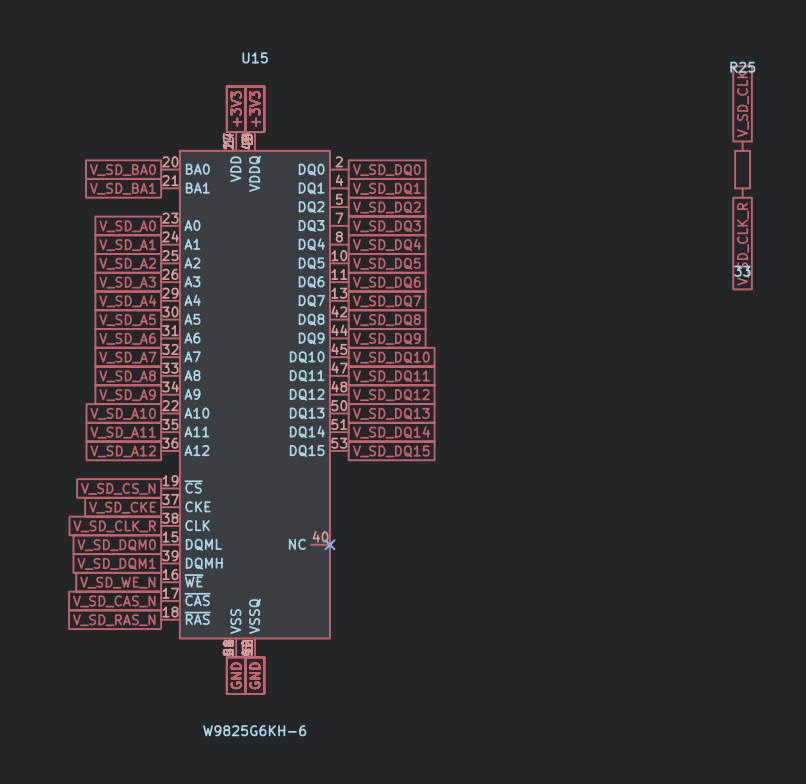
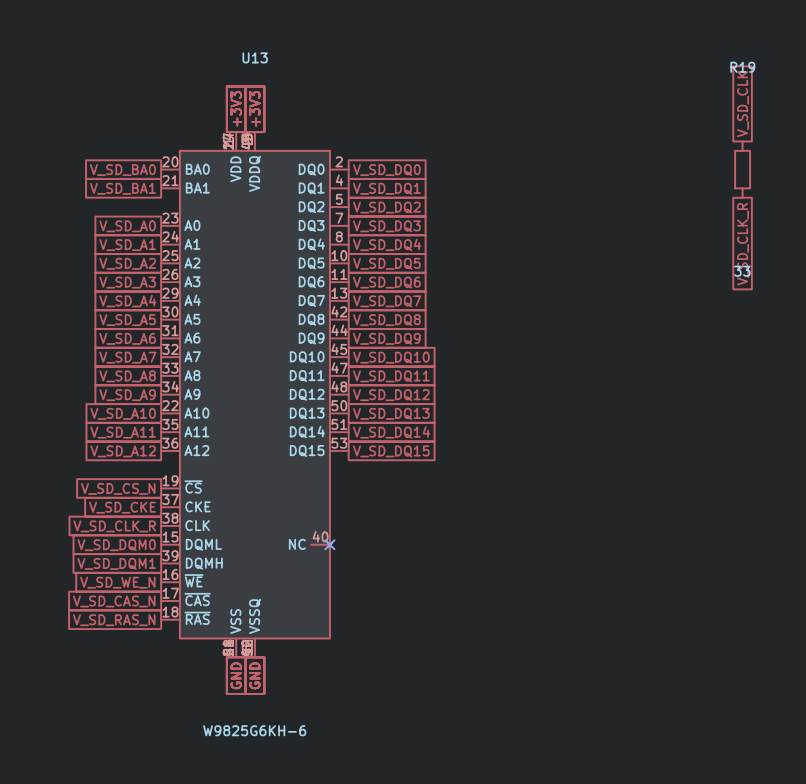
U15 name: U15 (255, 57) -> U13 (255, 57)
R25 name: R25 (742, 67) -> R19 (742, 67)

